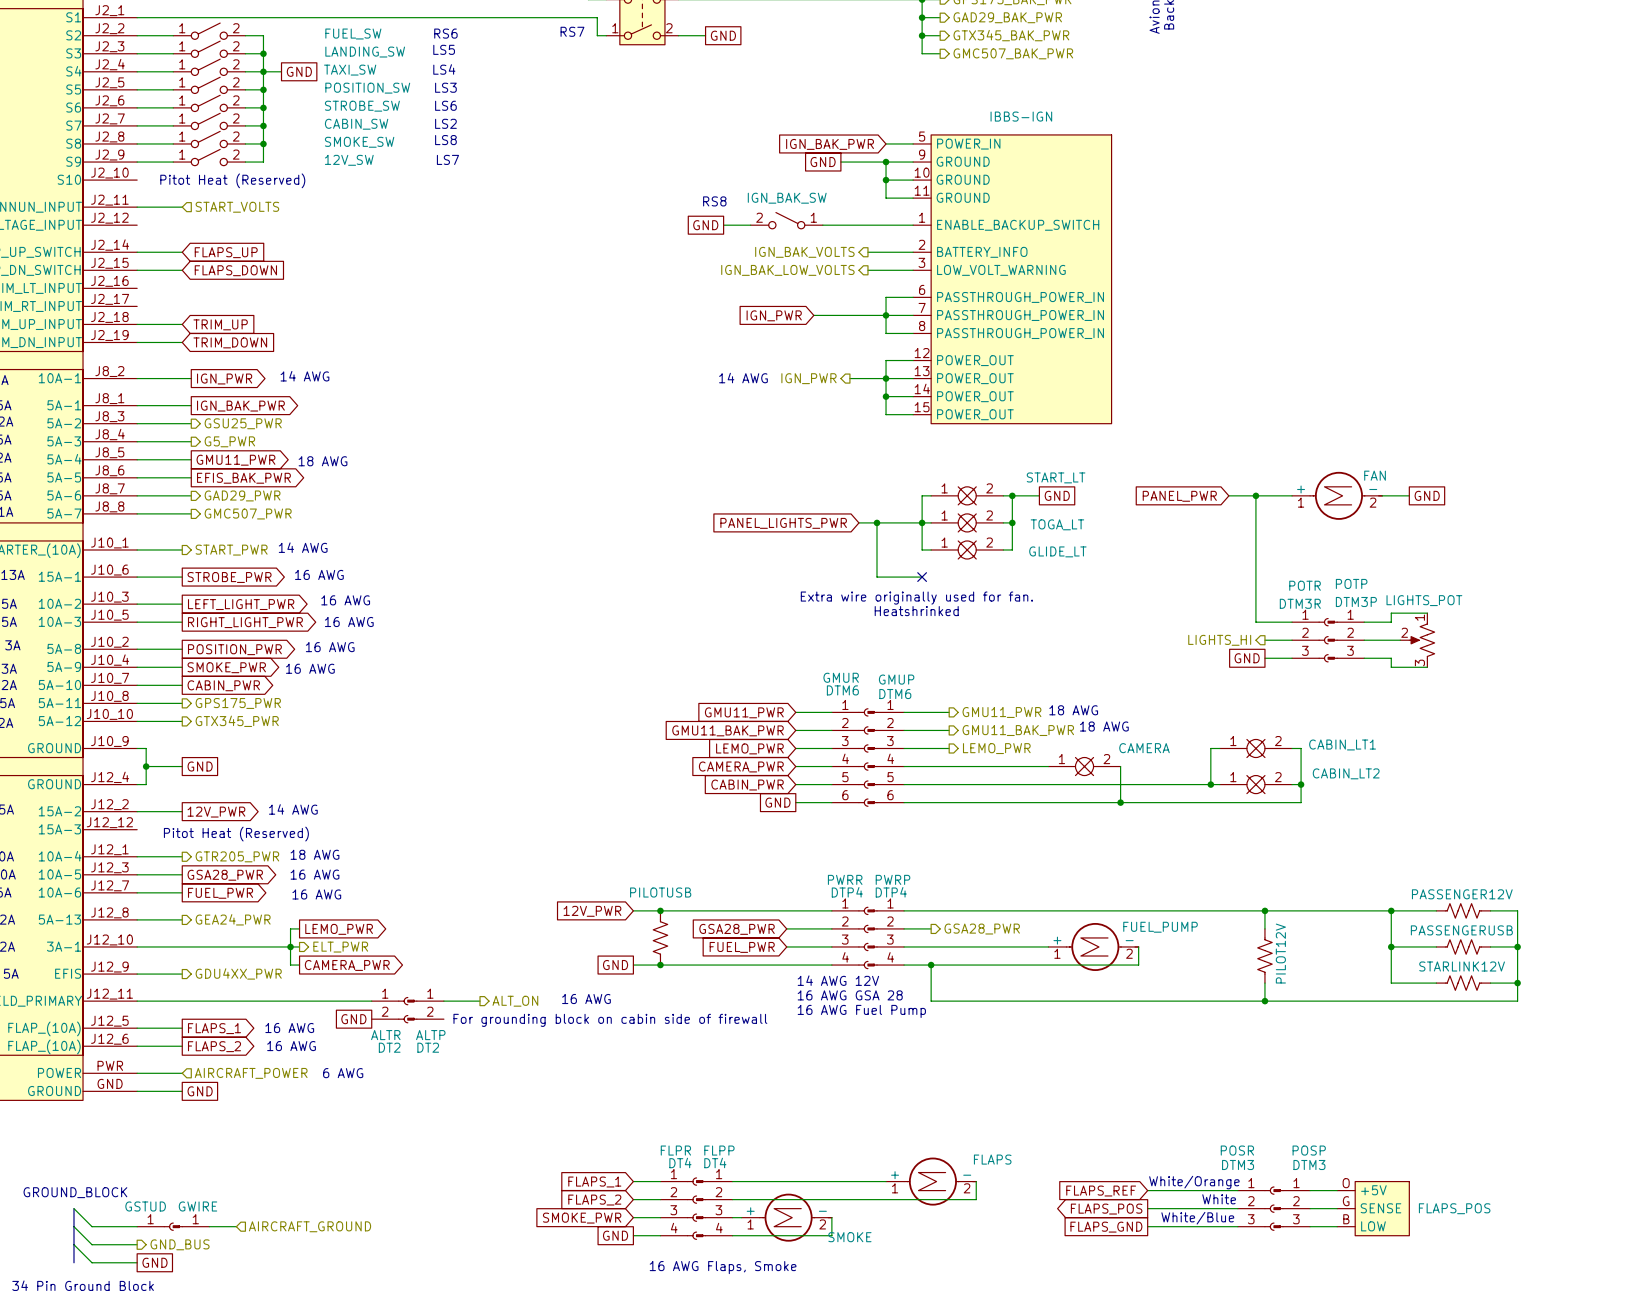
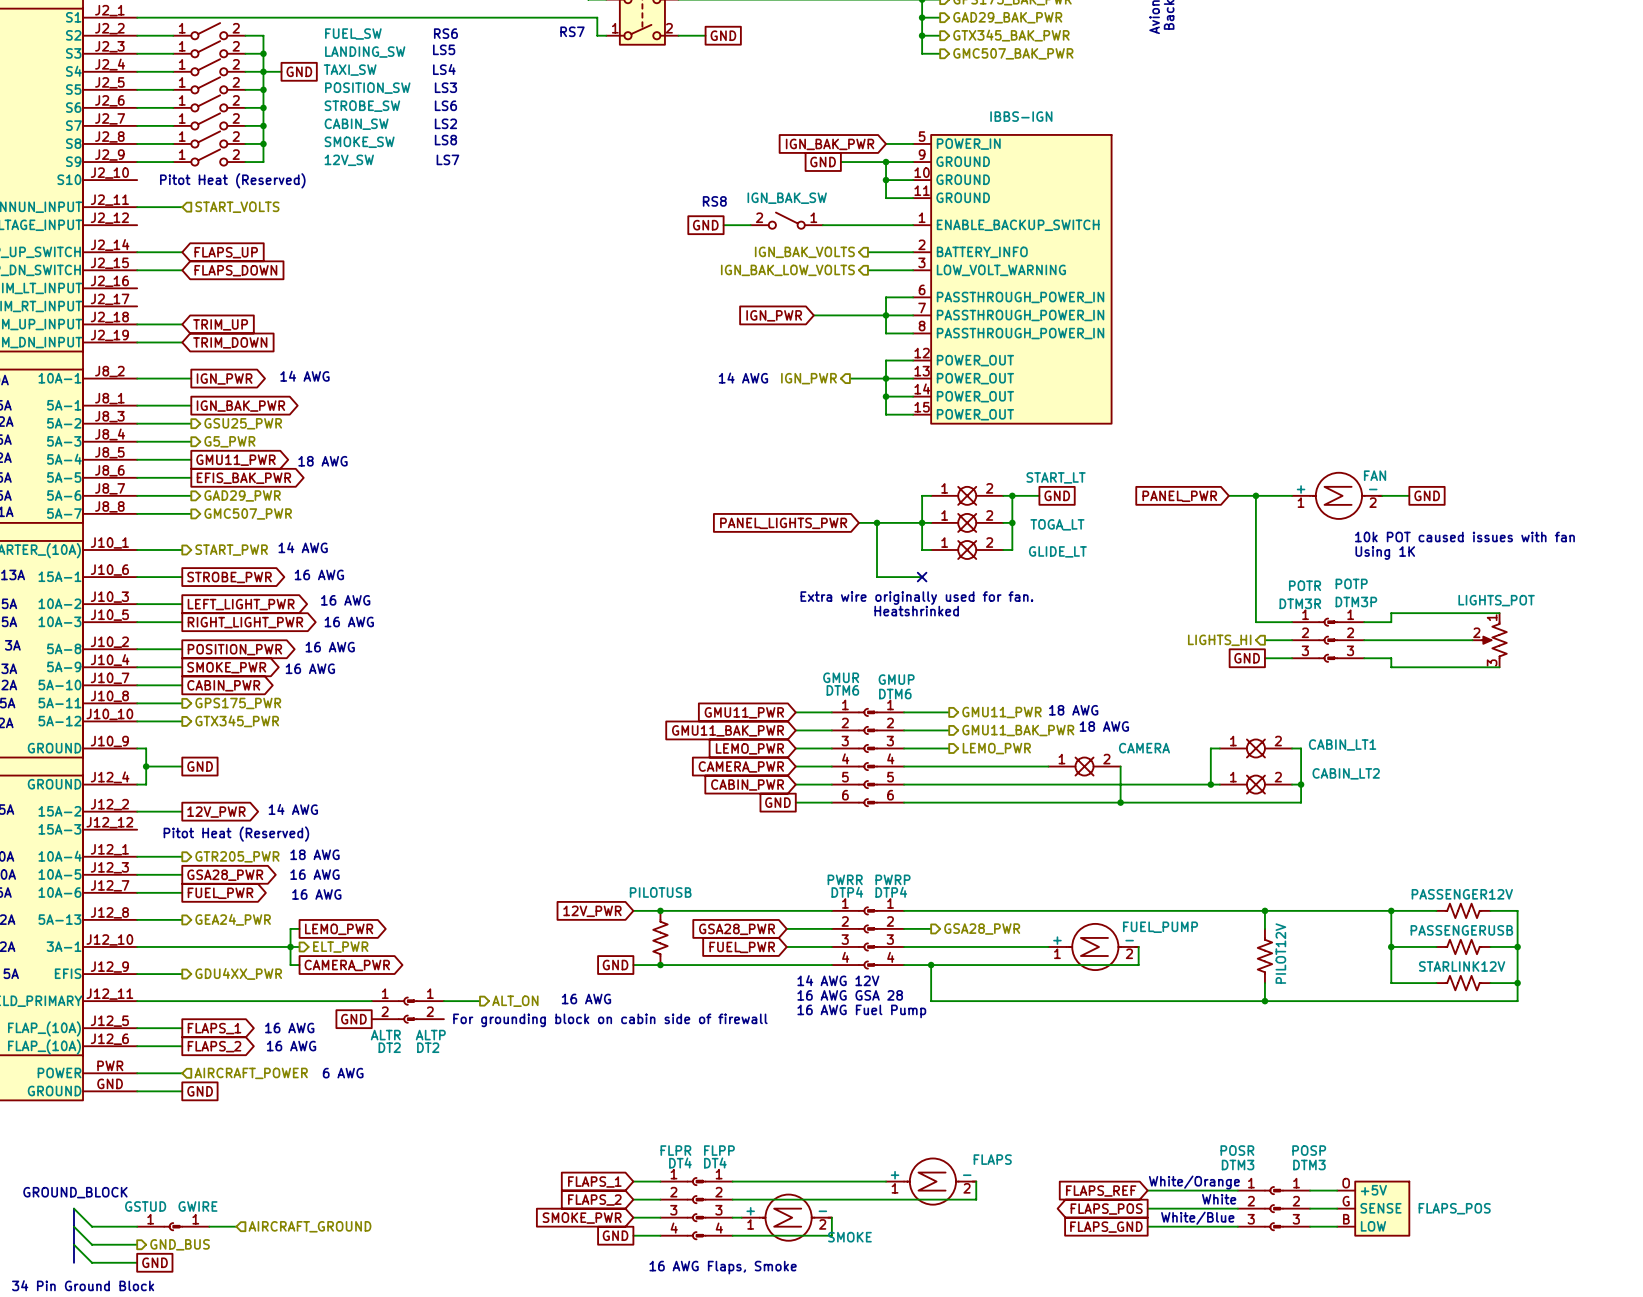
text: none -> 10k POT caused issues with fan (1464, 537)
text: none -> Using 1K (1385, 553)
wire: none -> (1427, 613) (1499, 613)
wire: none -> (1400, 640) (1472, 640)
LIGHTS_POT position: (1417, 640) -> (1489, 640)
wire: none -> (1427, 667) (1499, 667)

